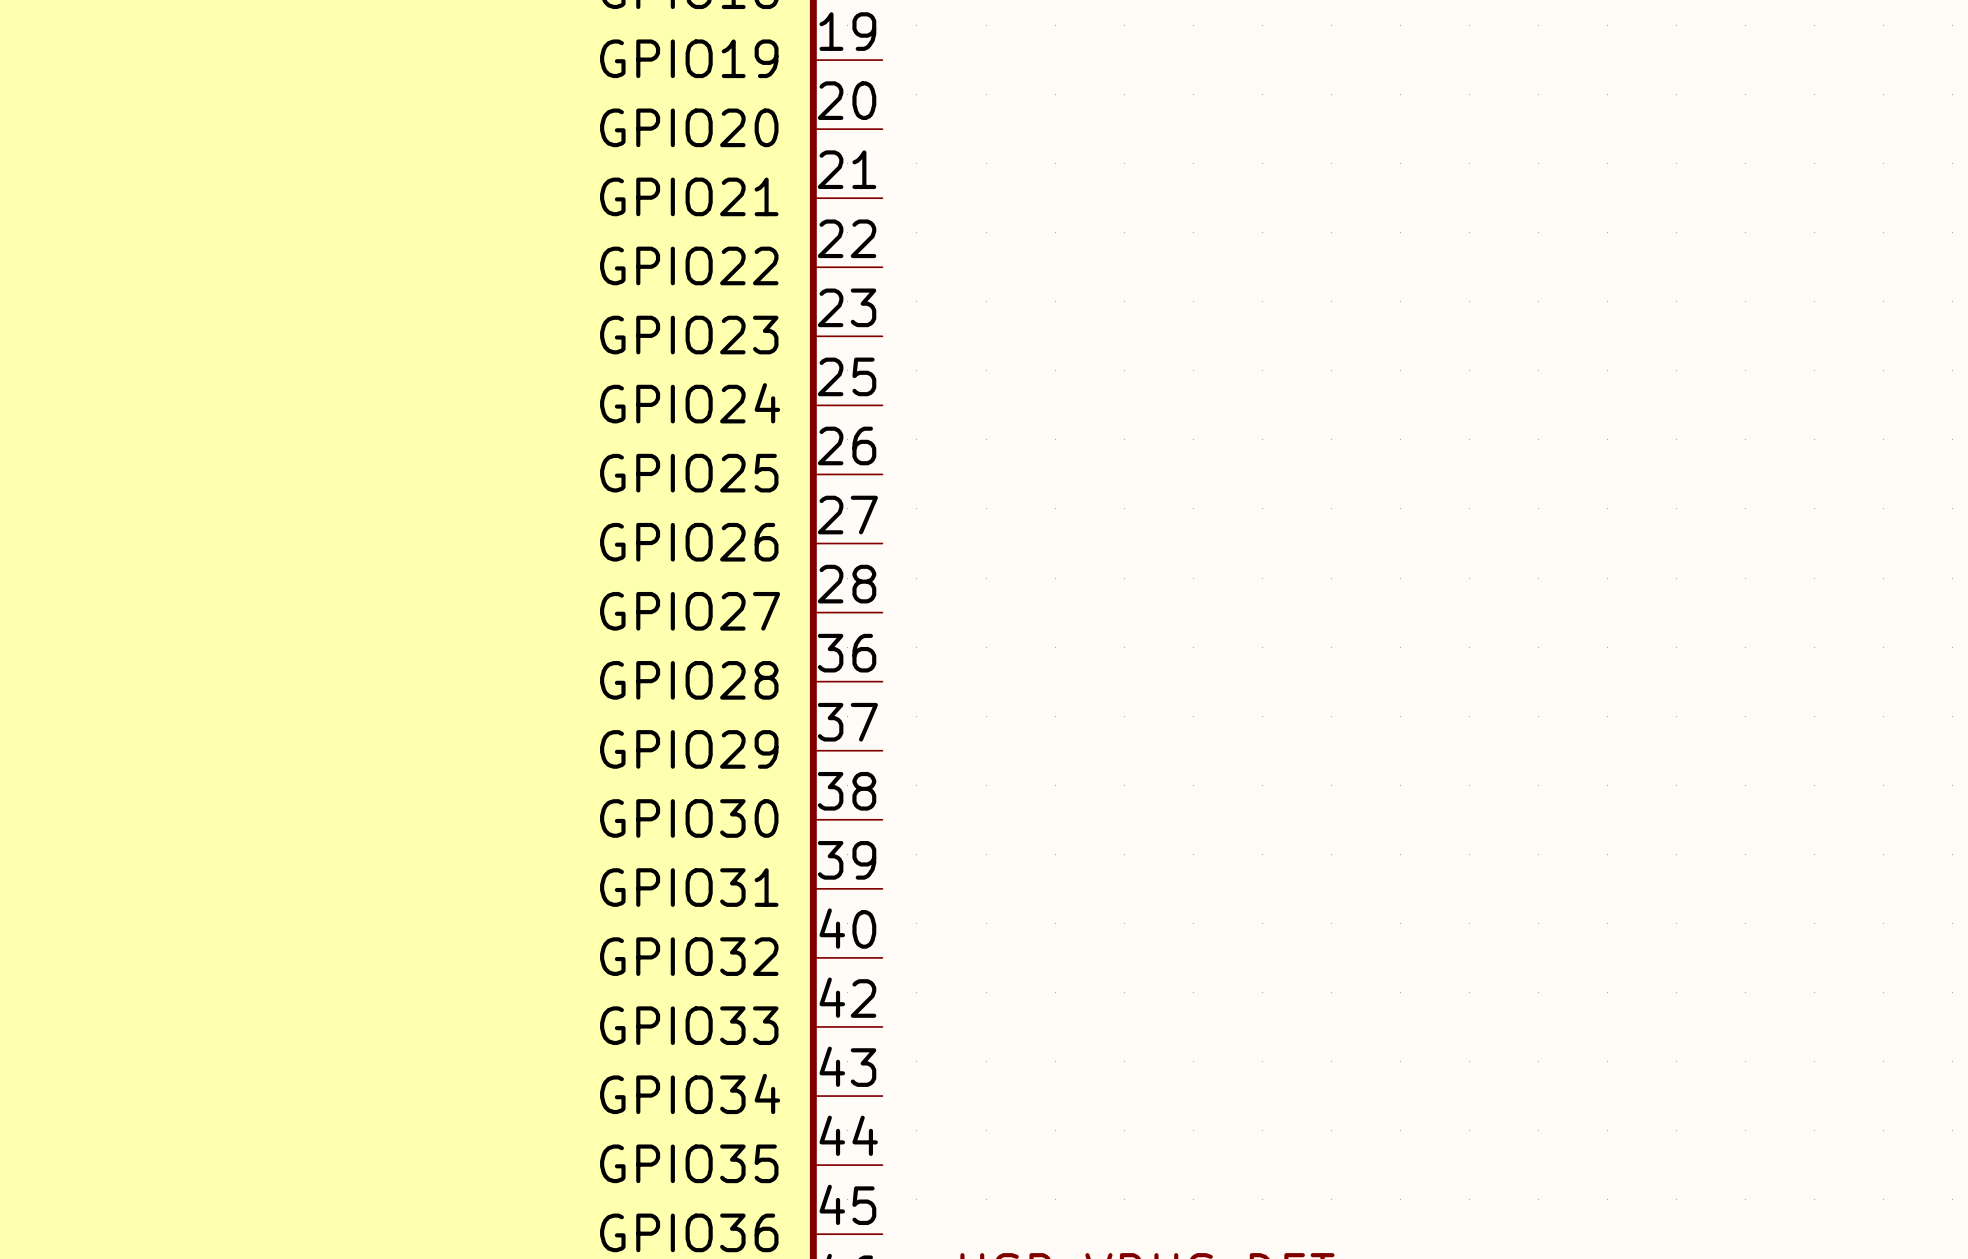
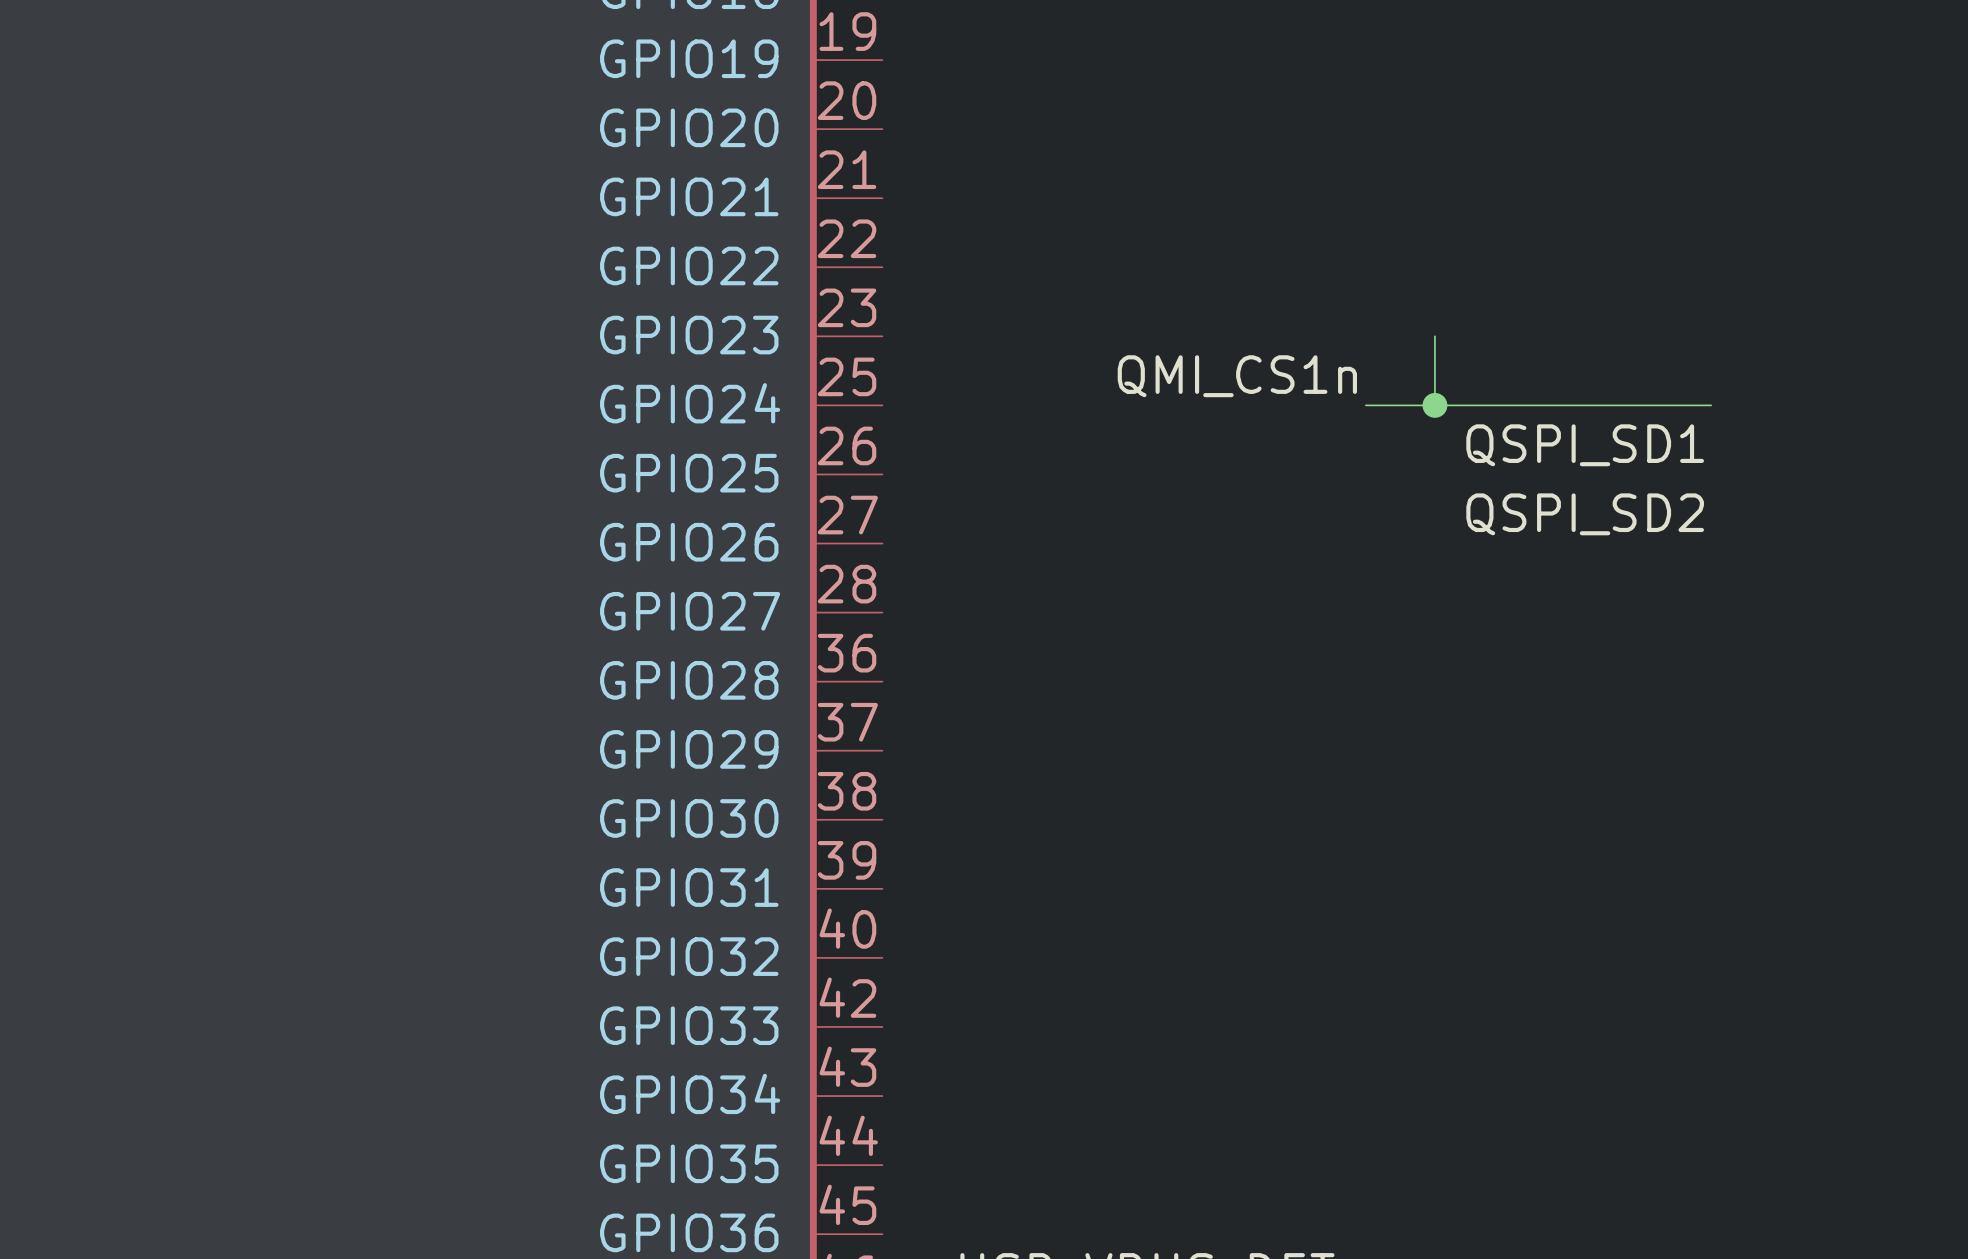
wire: none -> (1434, 336) (1434, 405)
label: none -> QMI_CS1n (1237, 376)
wire: none -> (1365, 405) (1711, 405)
junction: none -> (1434, 405)
label: none -> QSPI_SD1 (1585, 445)
label: none -> QSPI_SD2 (1585, 514)

